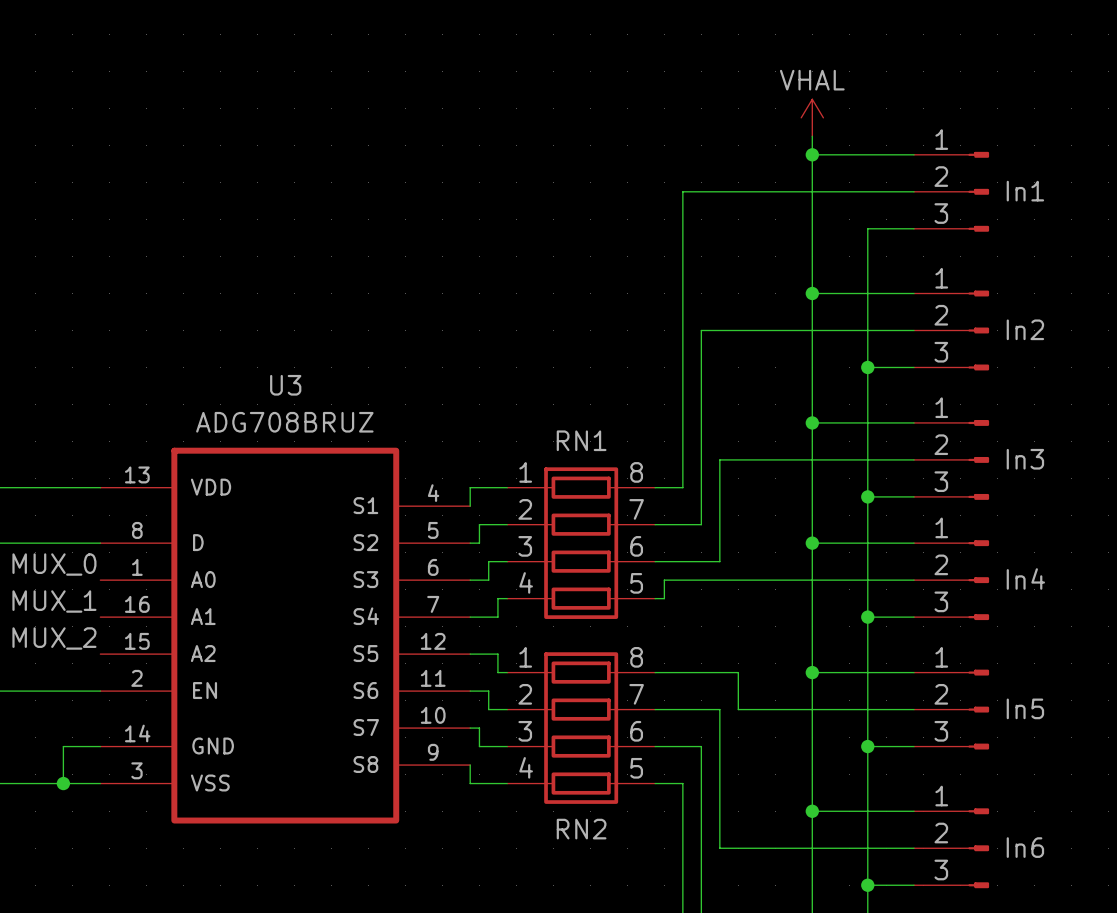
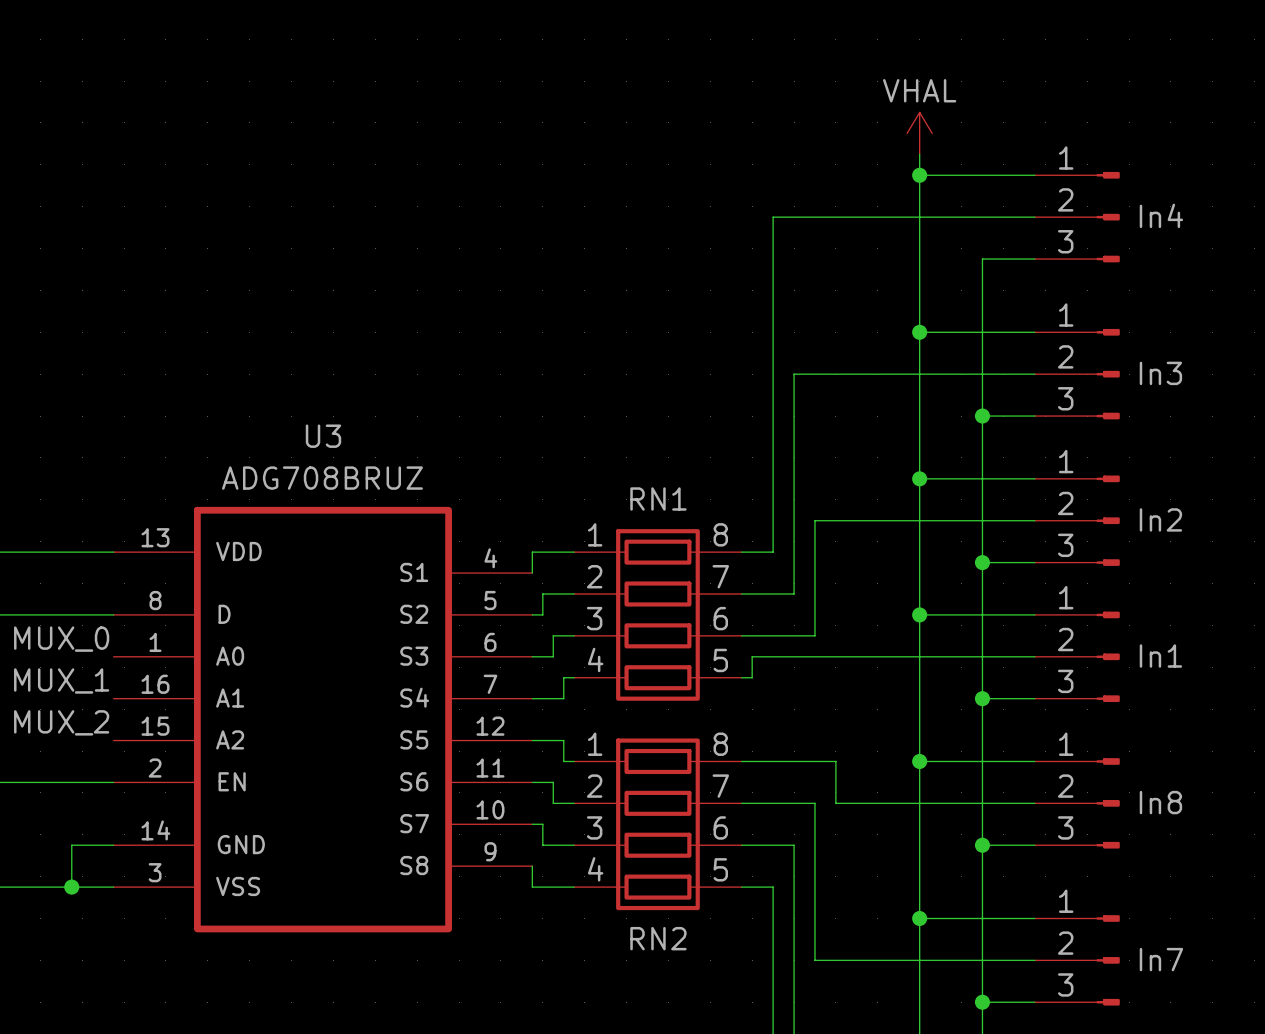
In1 name: In1 (1025, 191) -> In4 (1161, 215)
In2 name: In2 (1025, 329) -> In3 (1160, 373)
In3 name: In3 (1025, 459) -> In2 (1160, 519)
In4 name: In4 (1025, 579) -> In1 (1160, 656)
In5 name: In5 (1025, 708) -> In8 (1160, 802)
In6 name: In6 (1025, 847) -> In7 (1161, 959)

